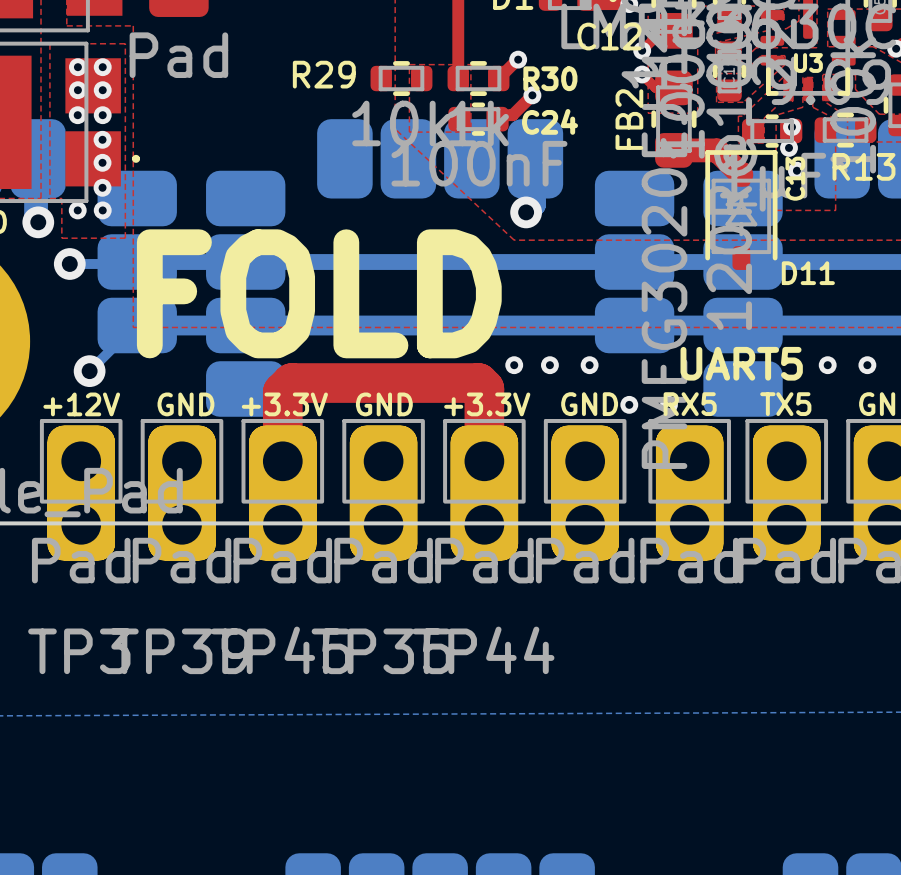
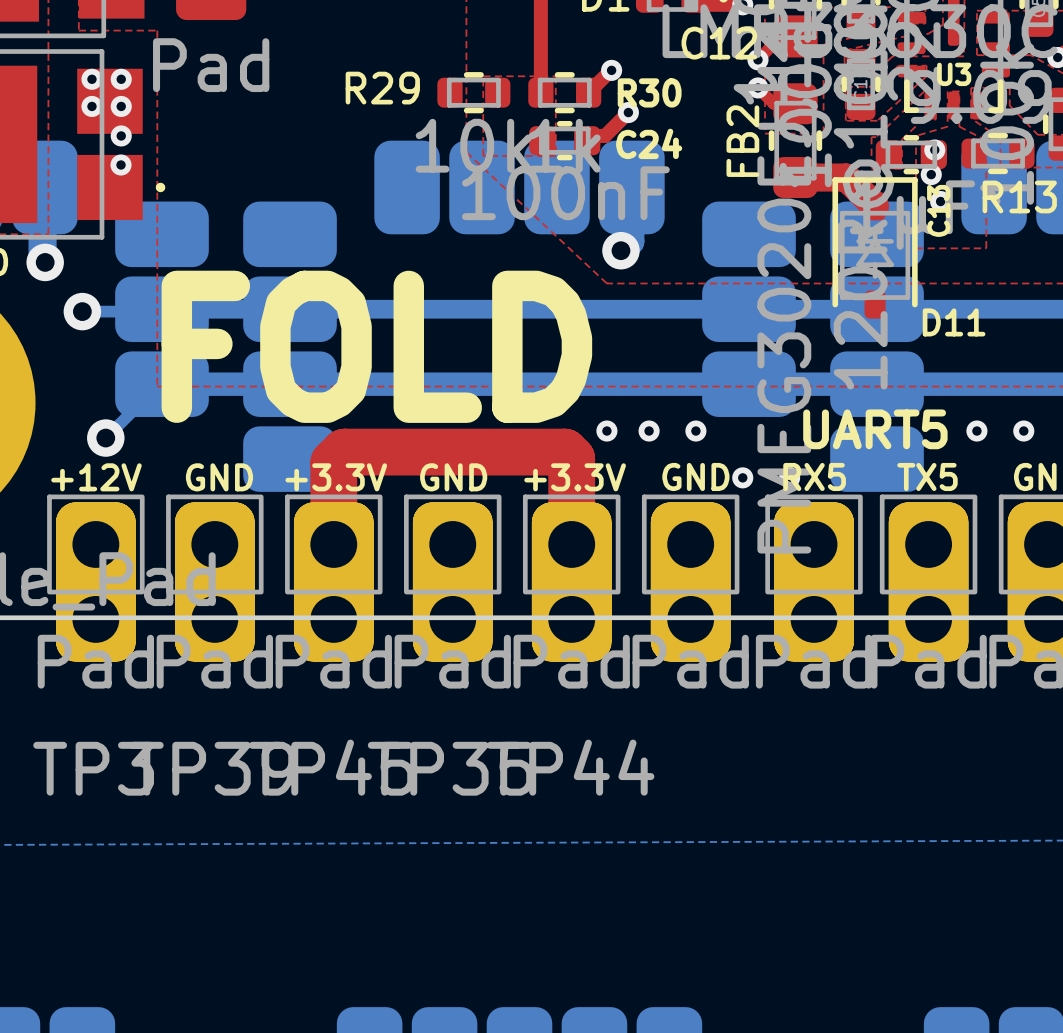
top zone outline: (49, 43) (125, 43) (125, 238) (61, 238) (61, 198) (49, 198) (49, 43) -> none
via: (77, 115) -> none
via: (102, 162) -> none
via: (102, 187) -> none
via: (77, 210) -> none
via: (102, 210) -> none

